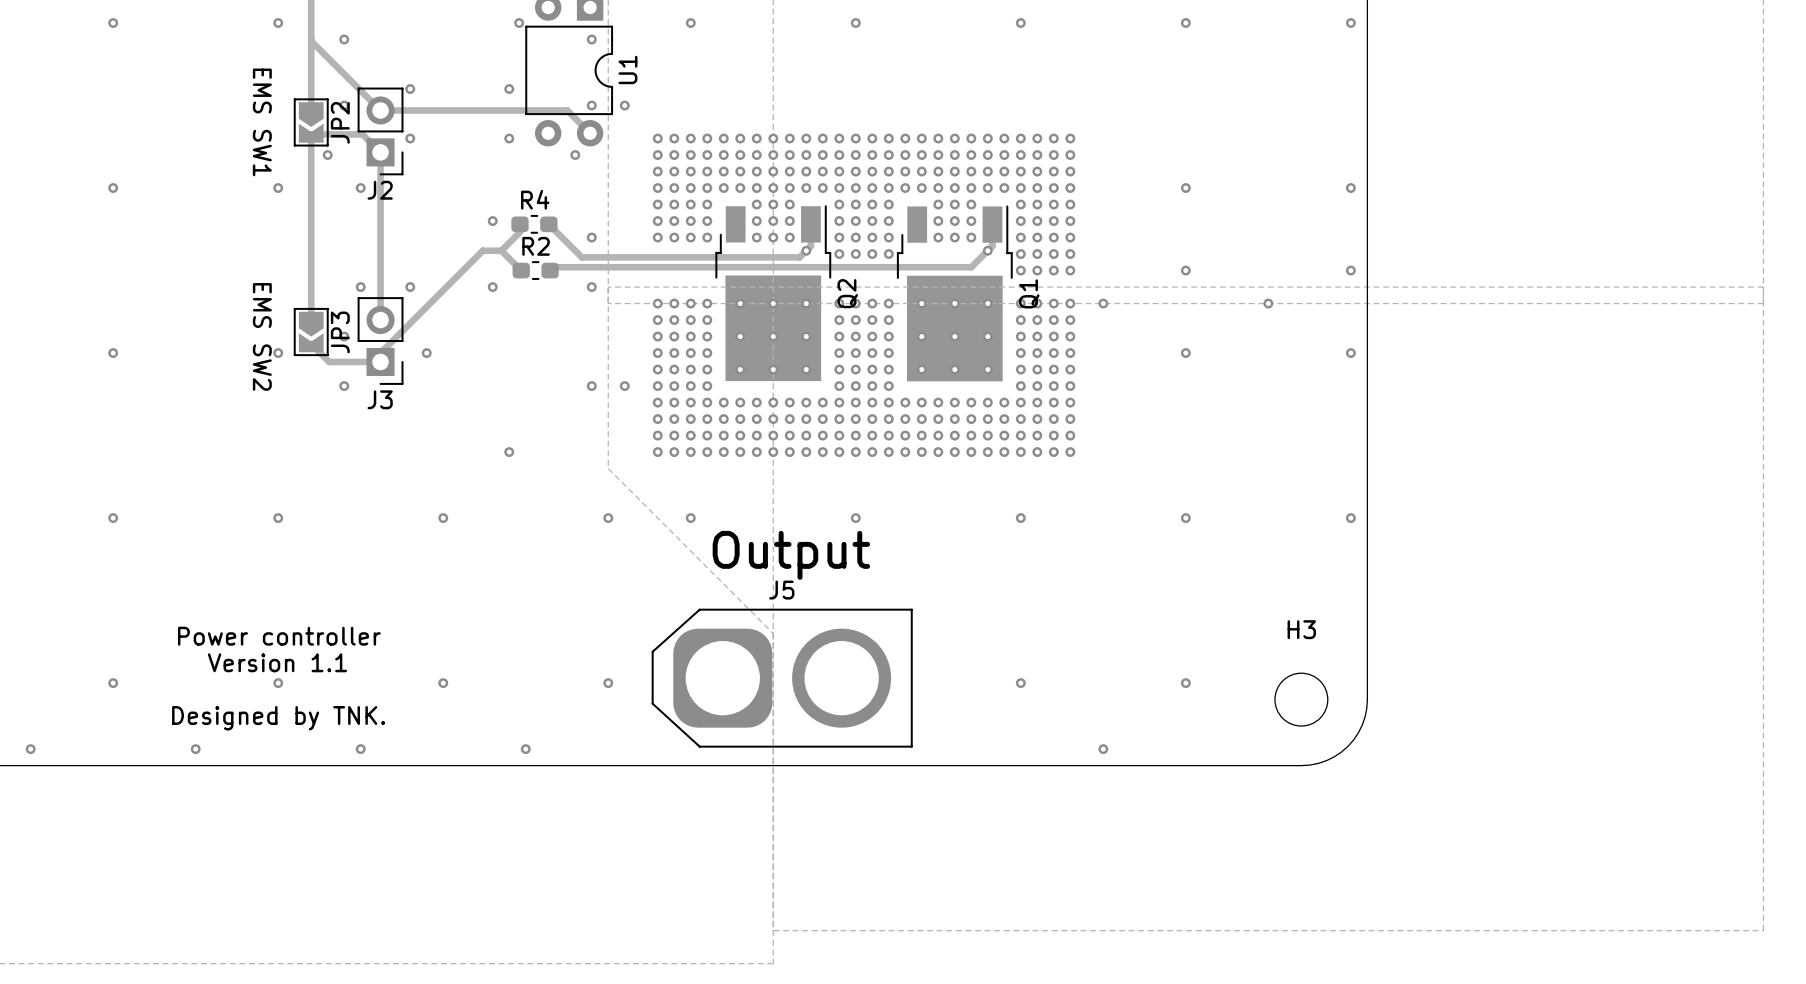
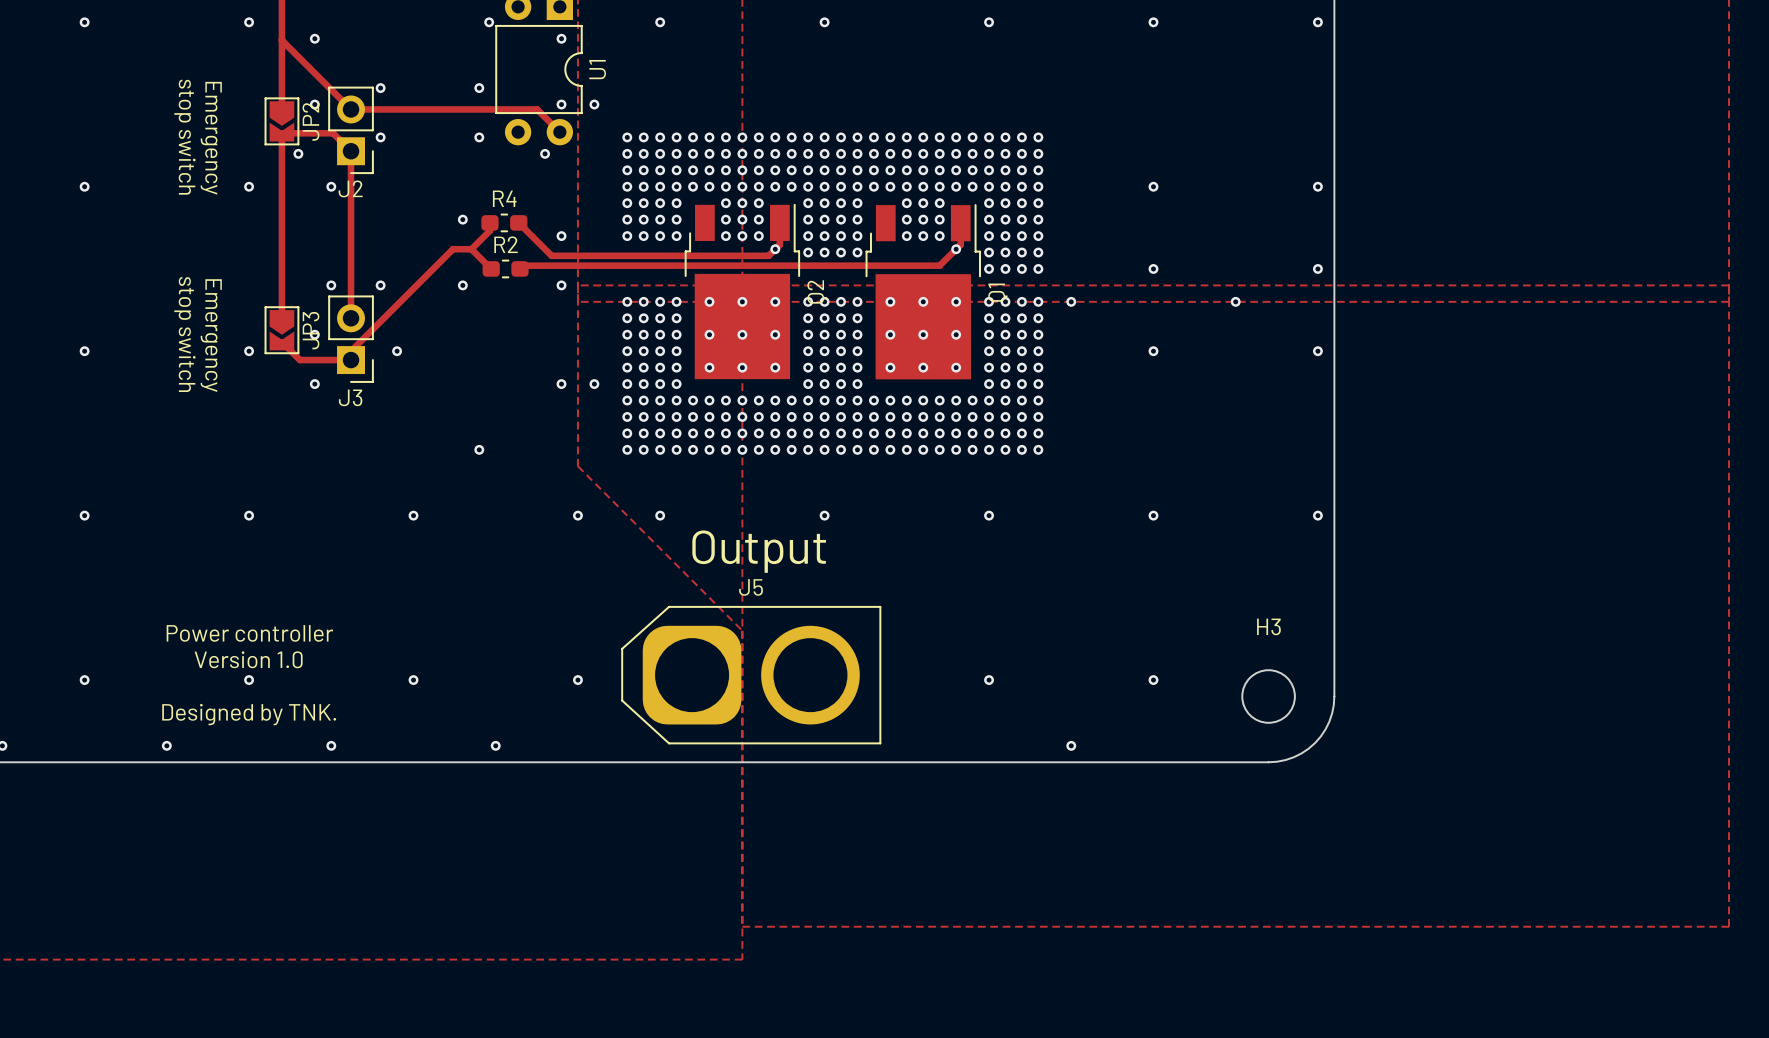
text: EMS SW1 (262, 122) -> none
text: none -> stop switch (184, 137)
text: none -> Emergency (211, 138)
text: none -> stop switch (184, 334)
text: EMS SW2 (262, 336) -> none
text: none -> Emergency (211, 335)
text: Version 1.1 (277, 662) -> Version 1.0 (248, 659)

